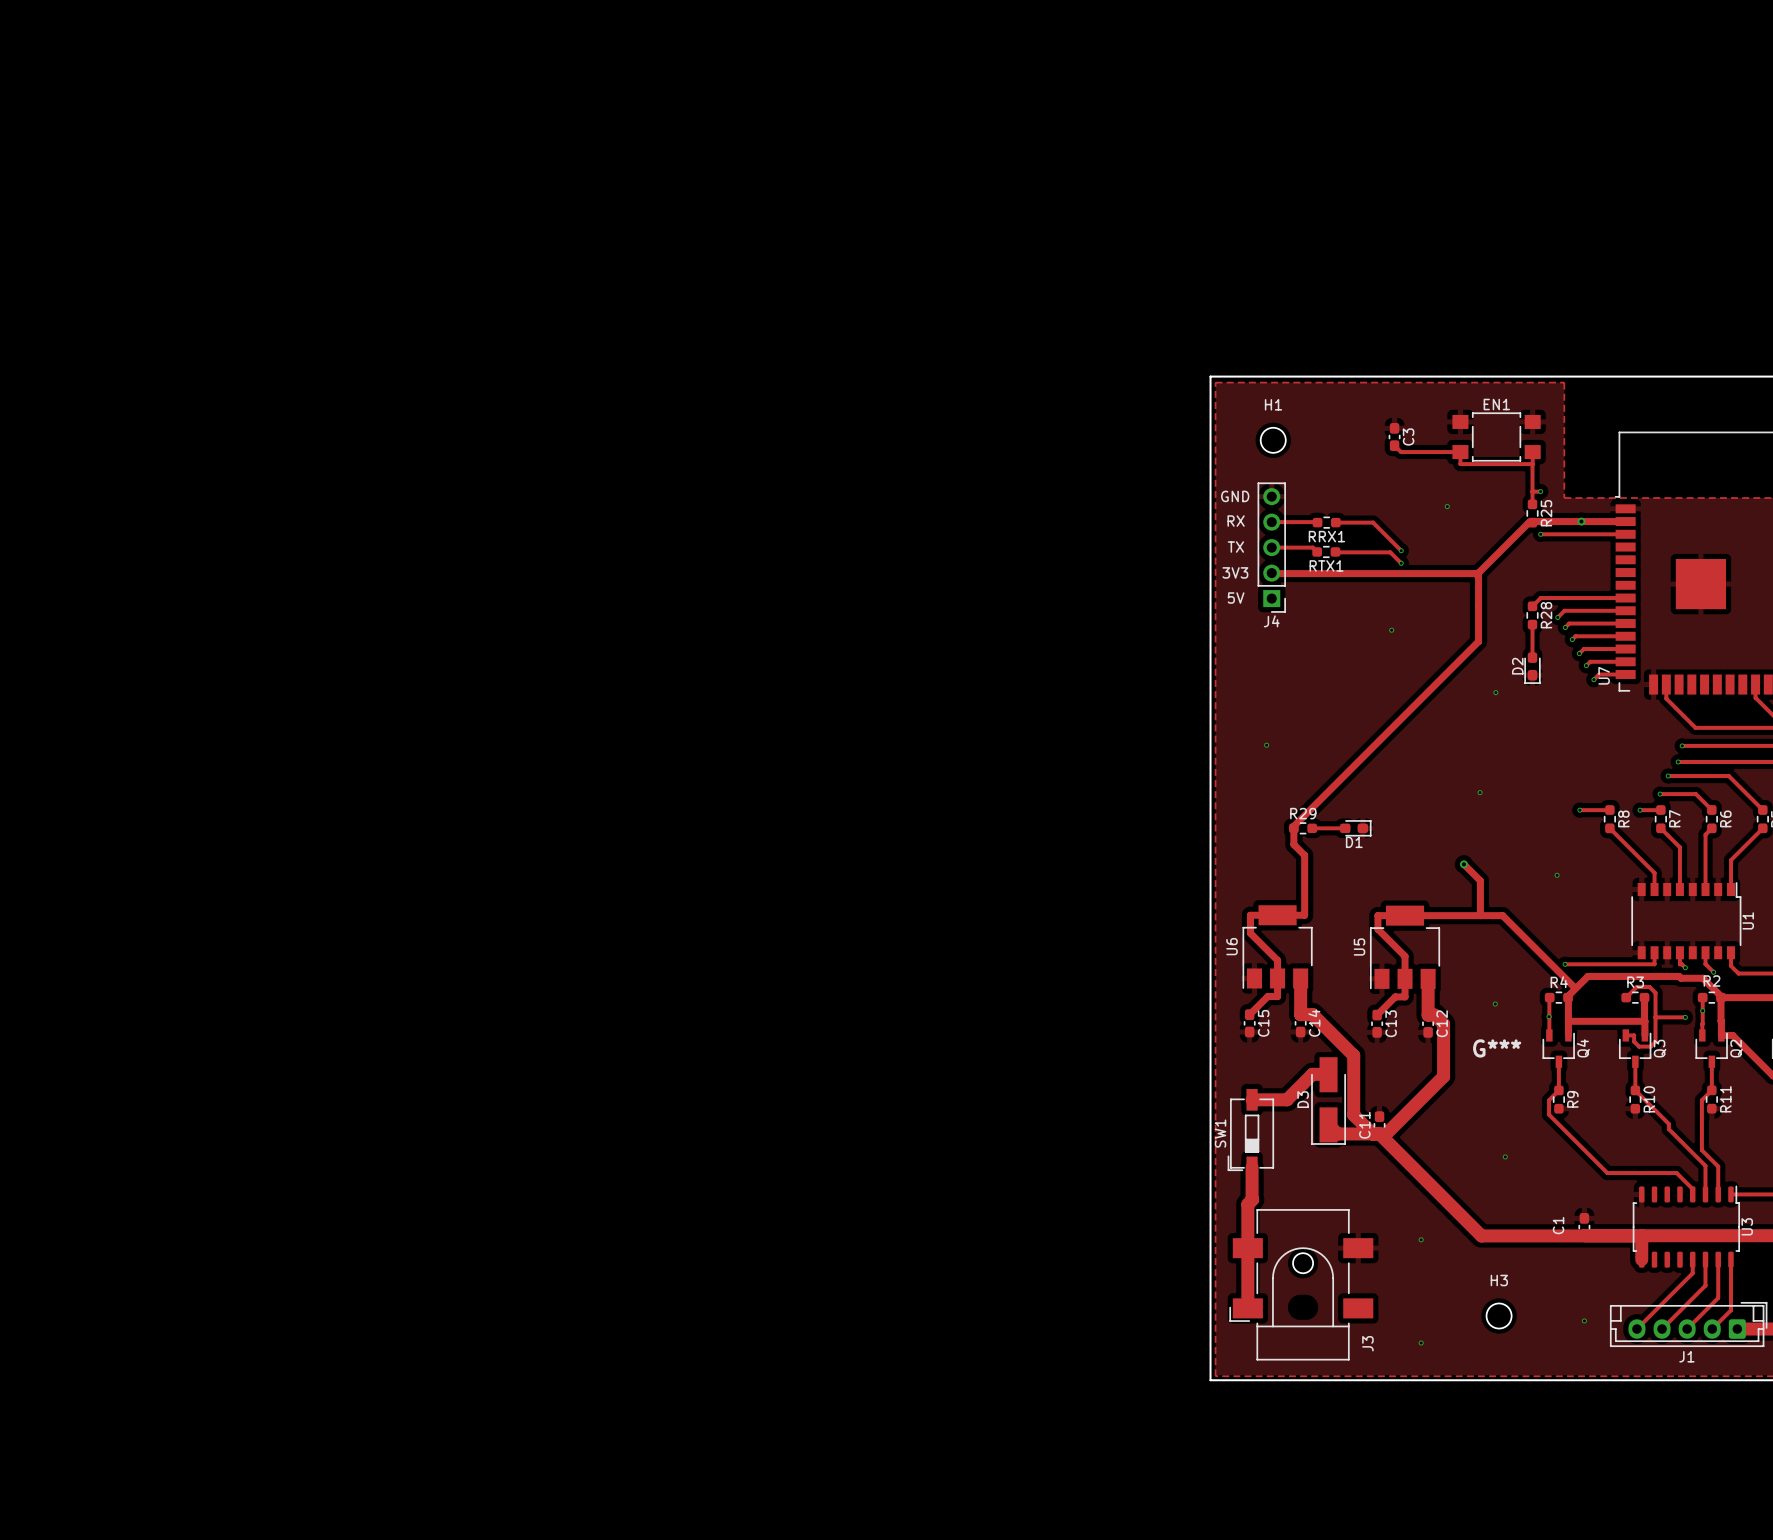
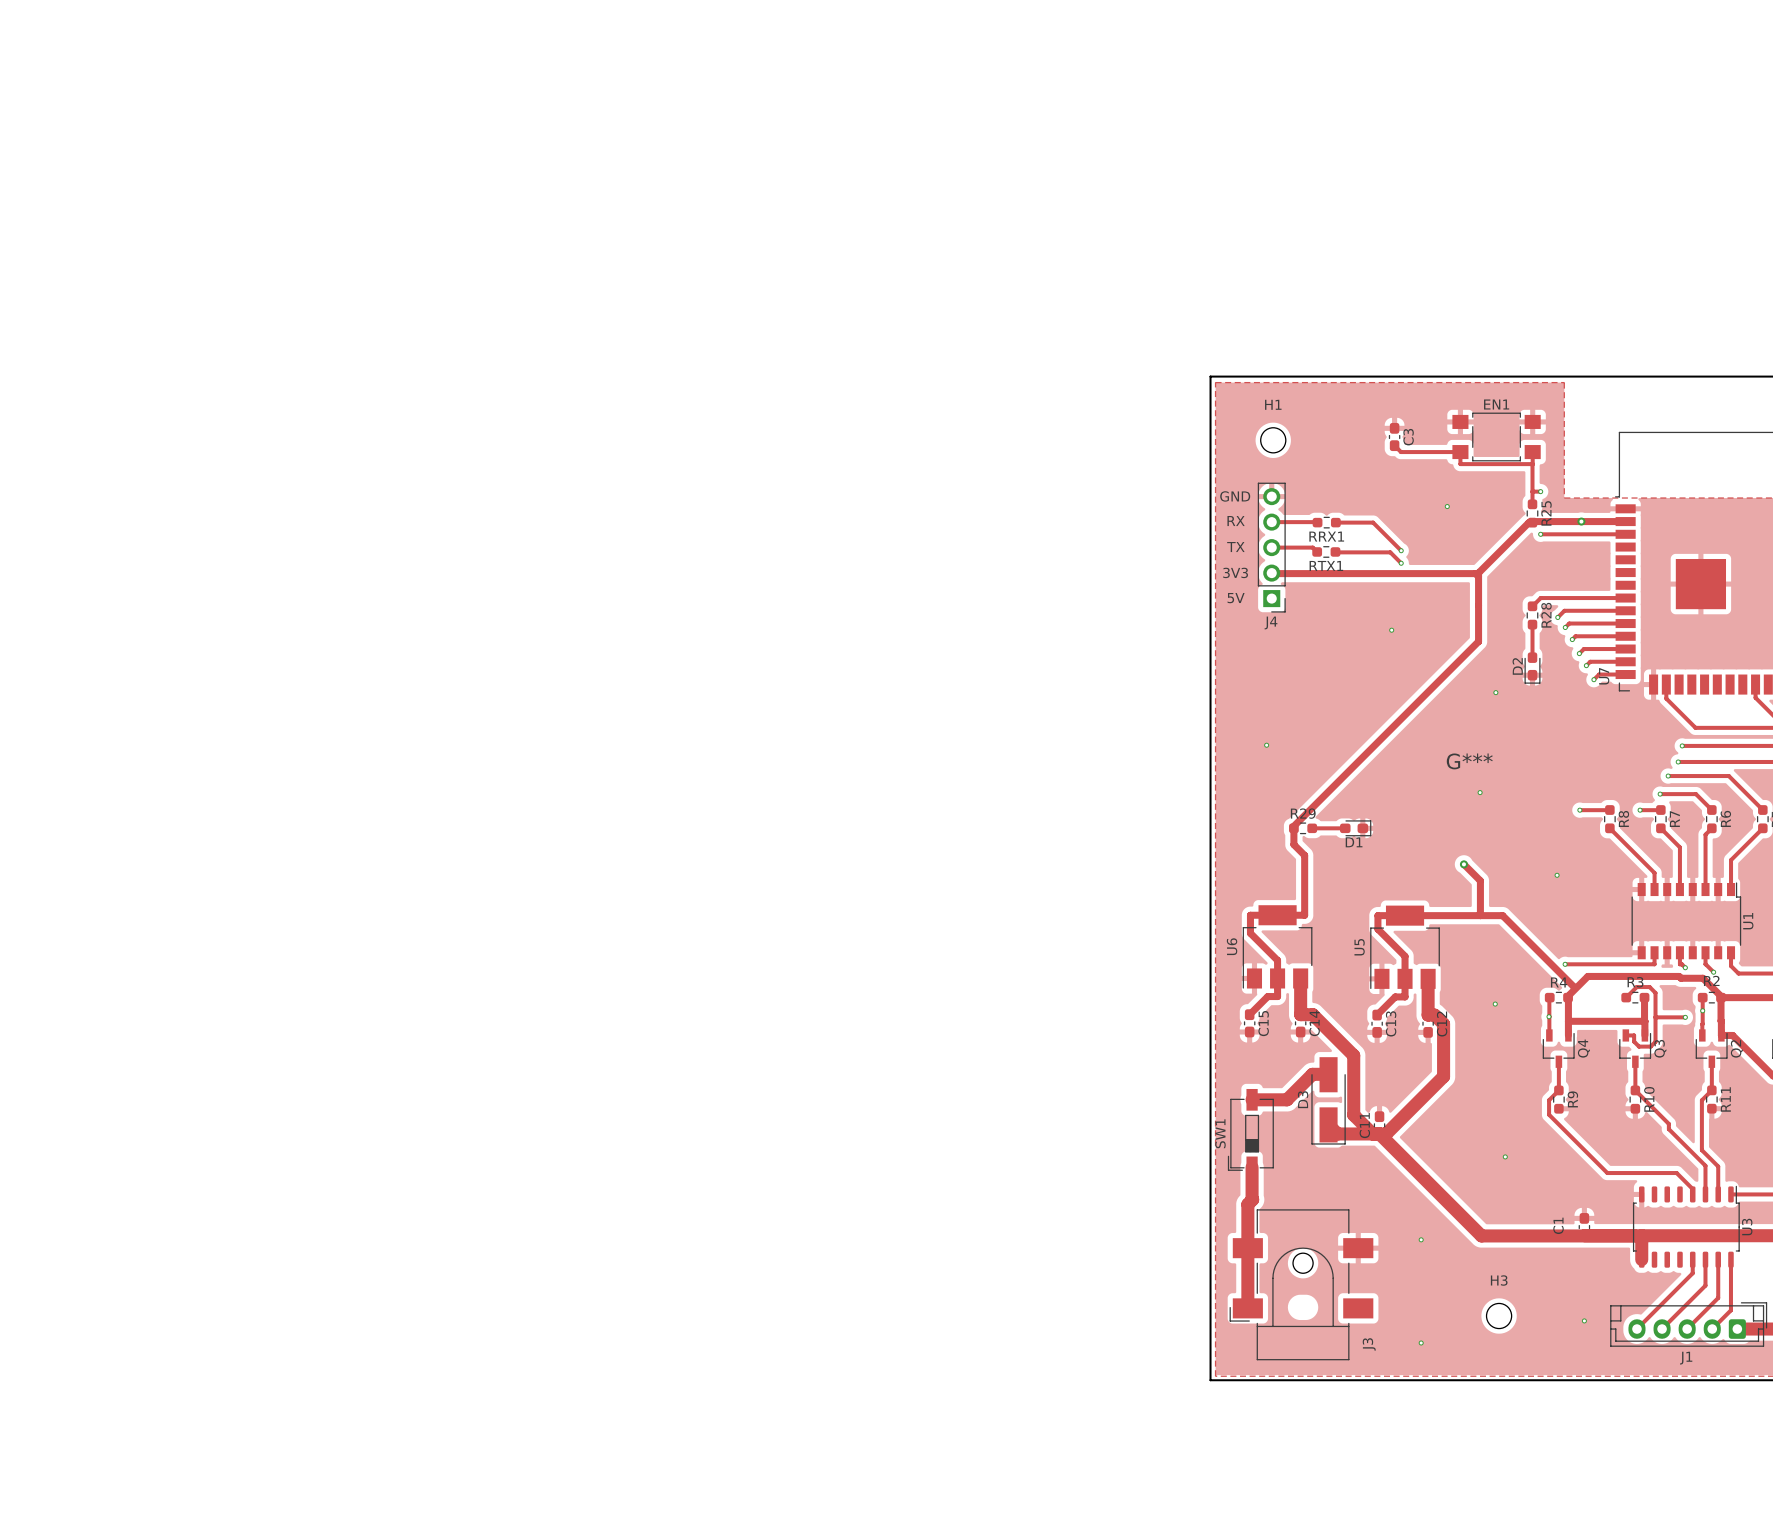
G***: none -> (1469, 761)
G***: (1497, 1048) -> none

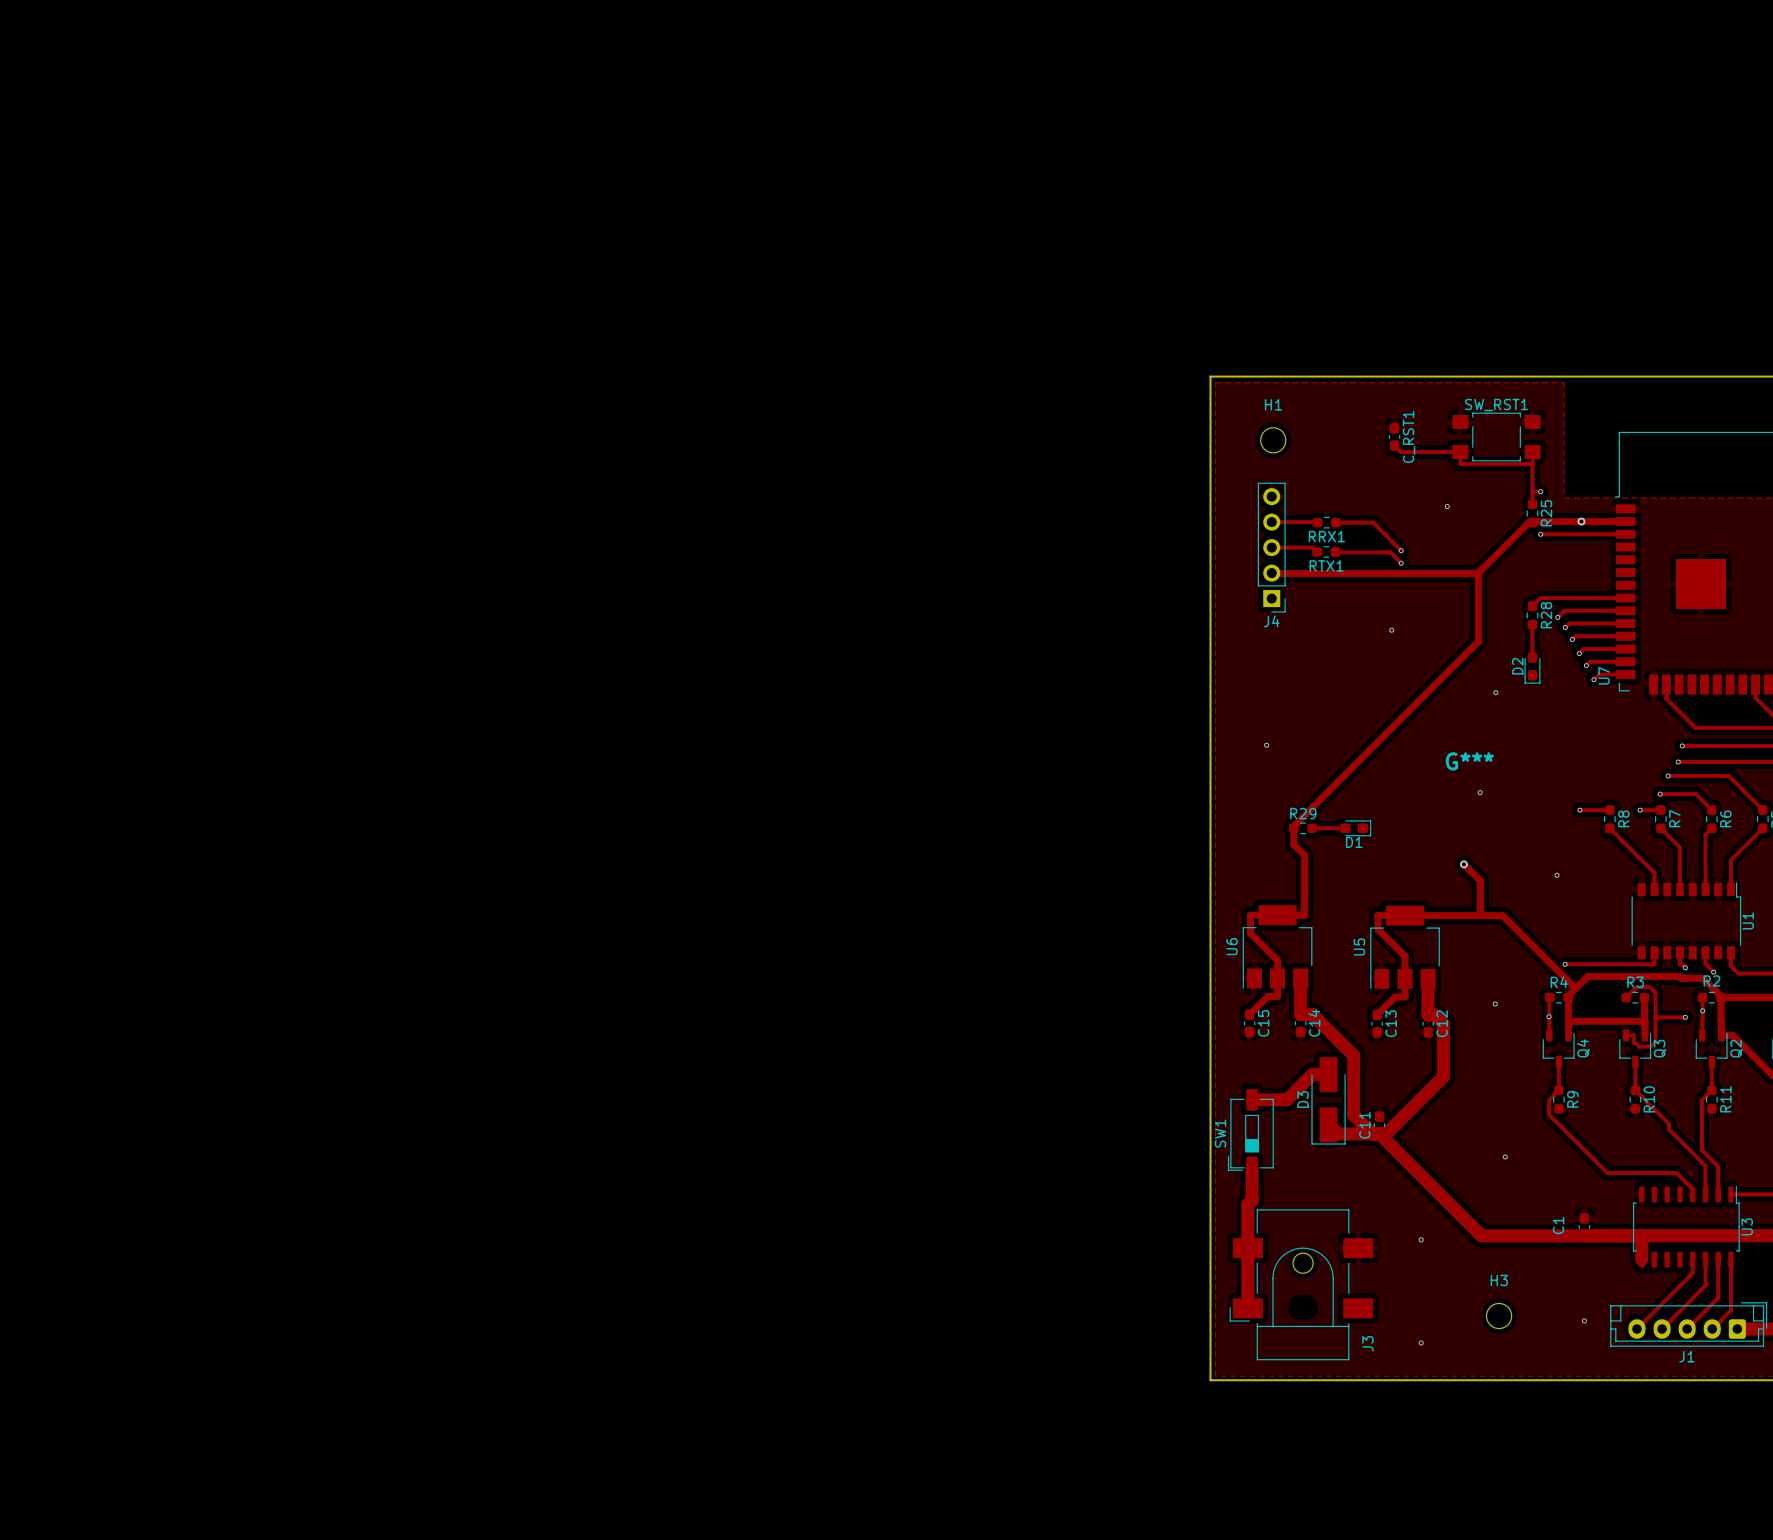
EN1 name: EN1 (1496, 404) -> SW_RST1 (1496, 404)
C3 name: C3 (1408, 437) -> C_RST1 (1409, 437)
text: GND (1235, 496) -> none
text: RX (1236, 521) -> none
text: TX (1235, 547) -> none
text: 3V3 (1235, 572) -> none
text: 5V (1236, 598) -> none

